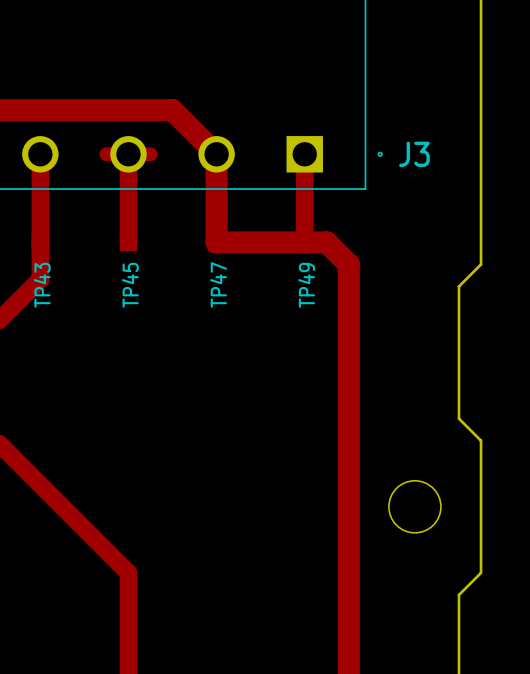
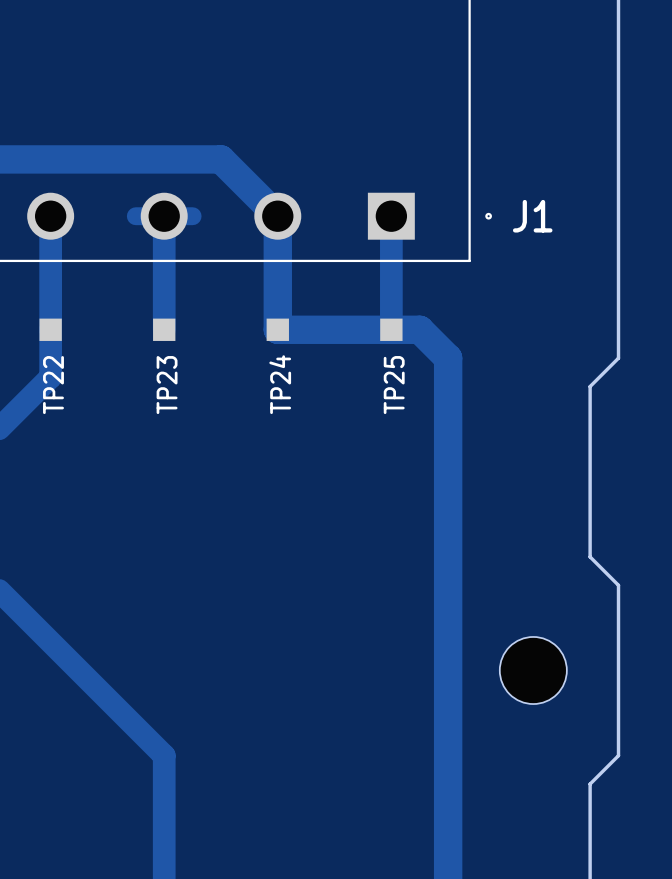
J3 name: J3 (414, 154) -> J1 (532, 216)
TP43 name: TP43 (42, 285) -> TP22 (53, 385)
TP45 name: TP45 (130, 285) -> TP23 (167, 385)
TP47 name: TP47 (218, 285) -> TP24 (280, 384)
TP49 name: TP49 (306, 285) -> TP25 (394, 385)

